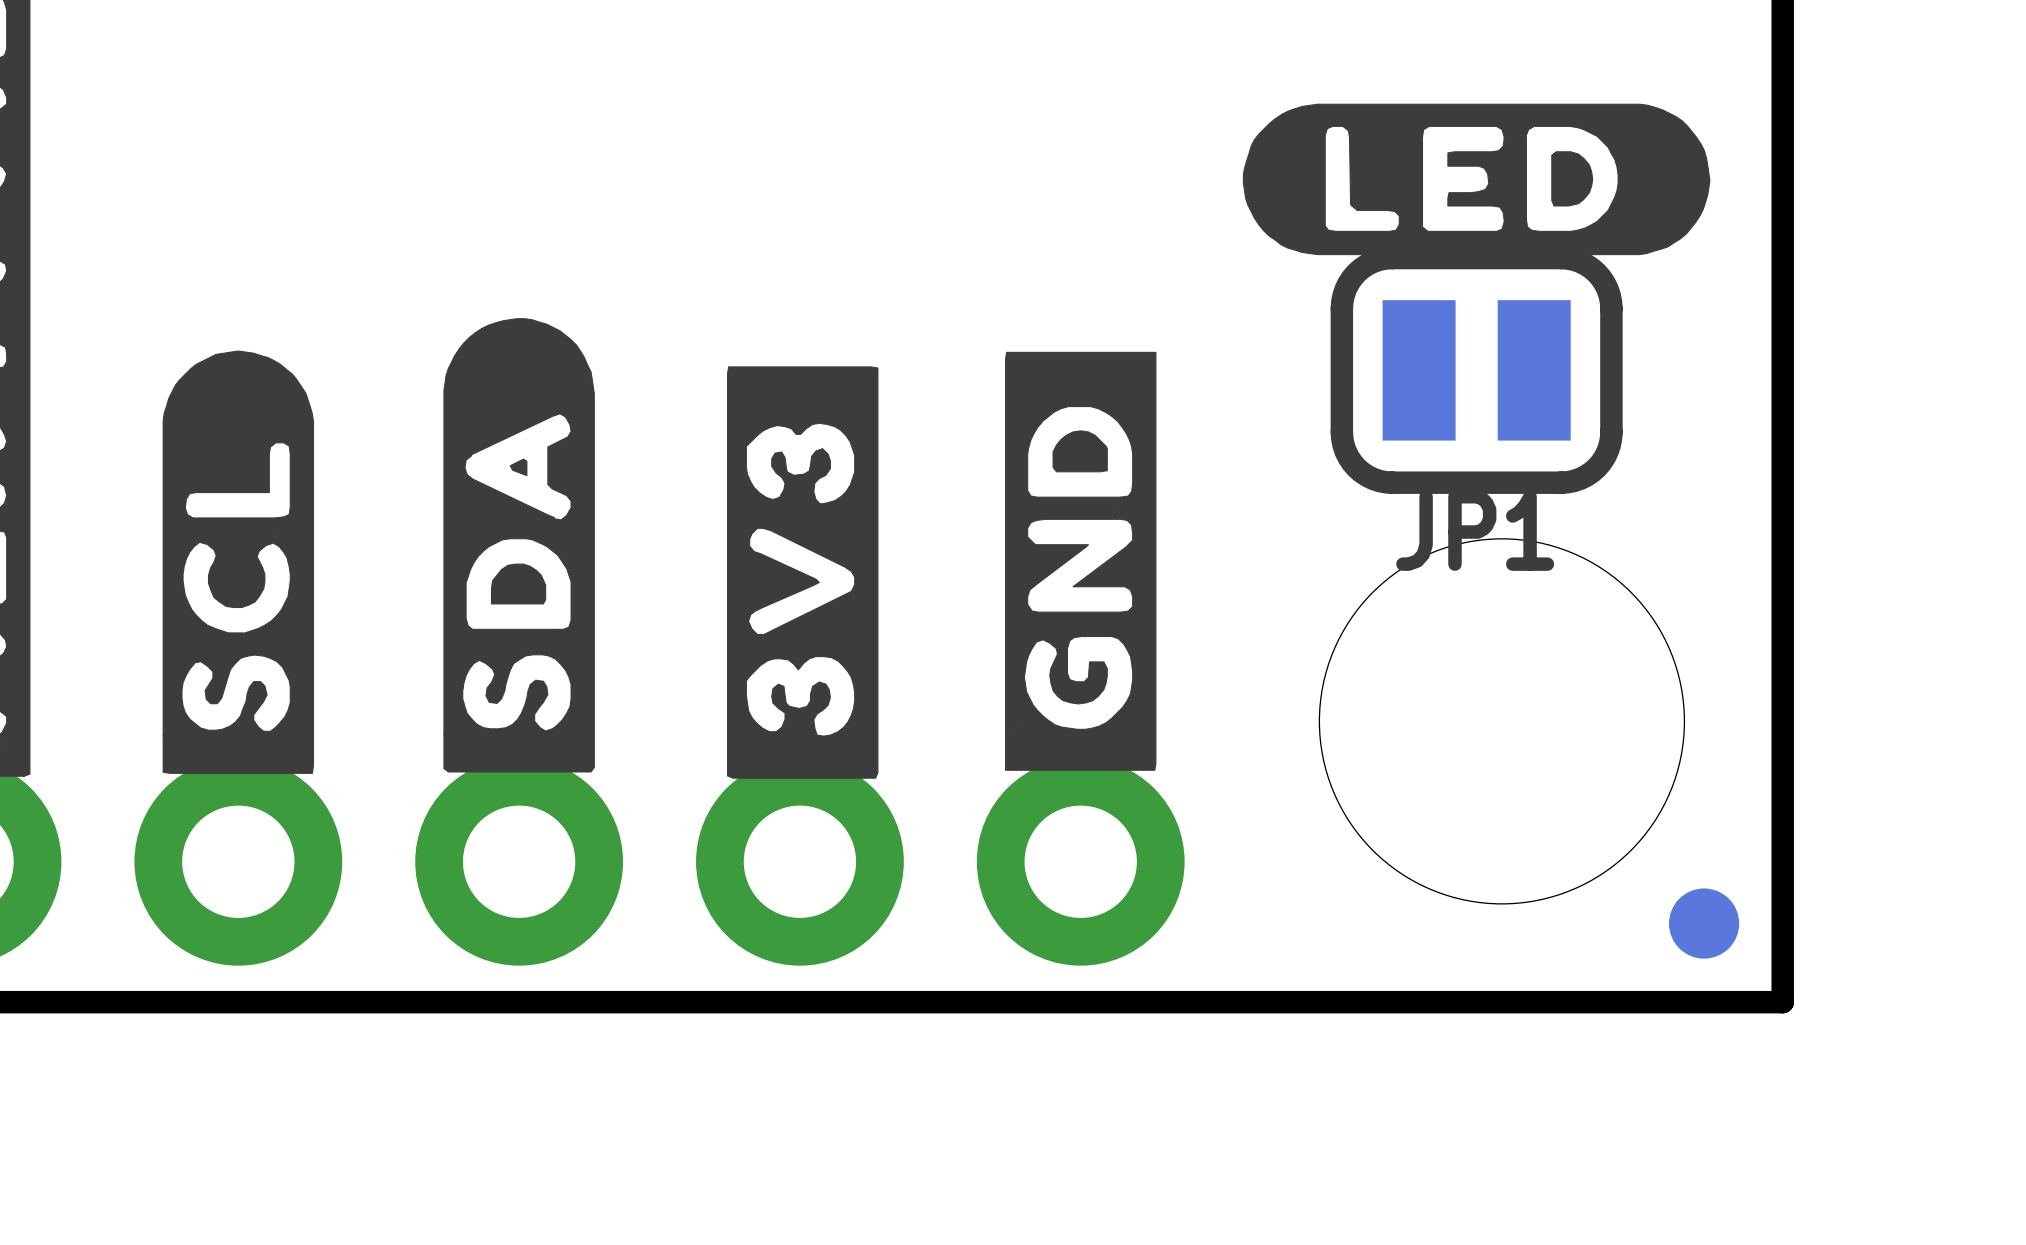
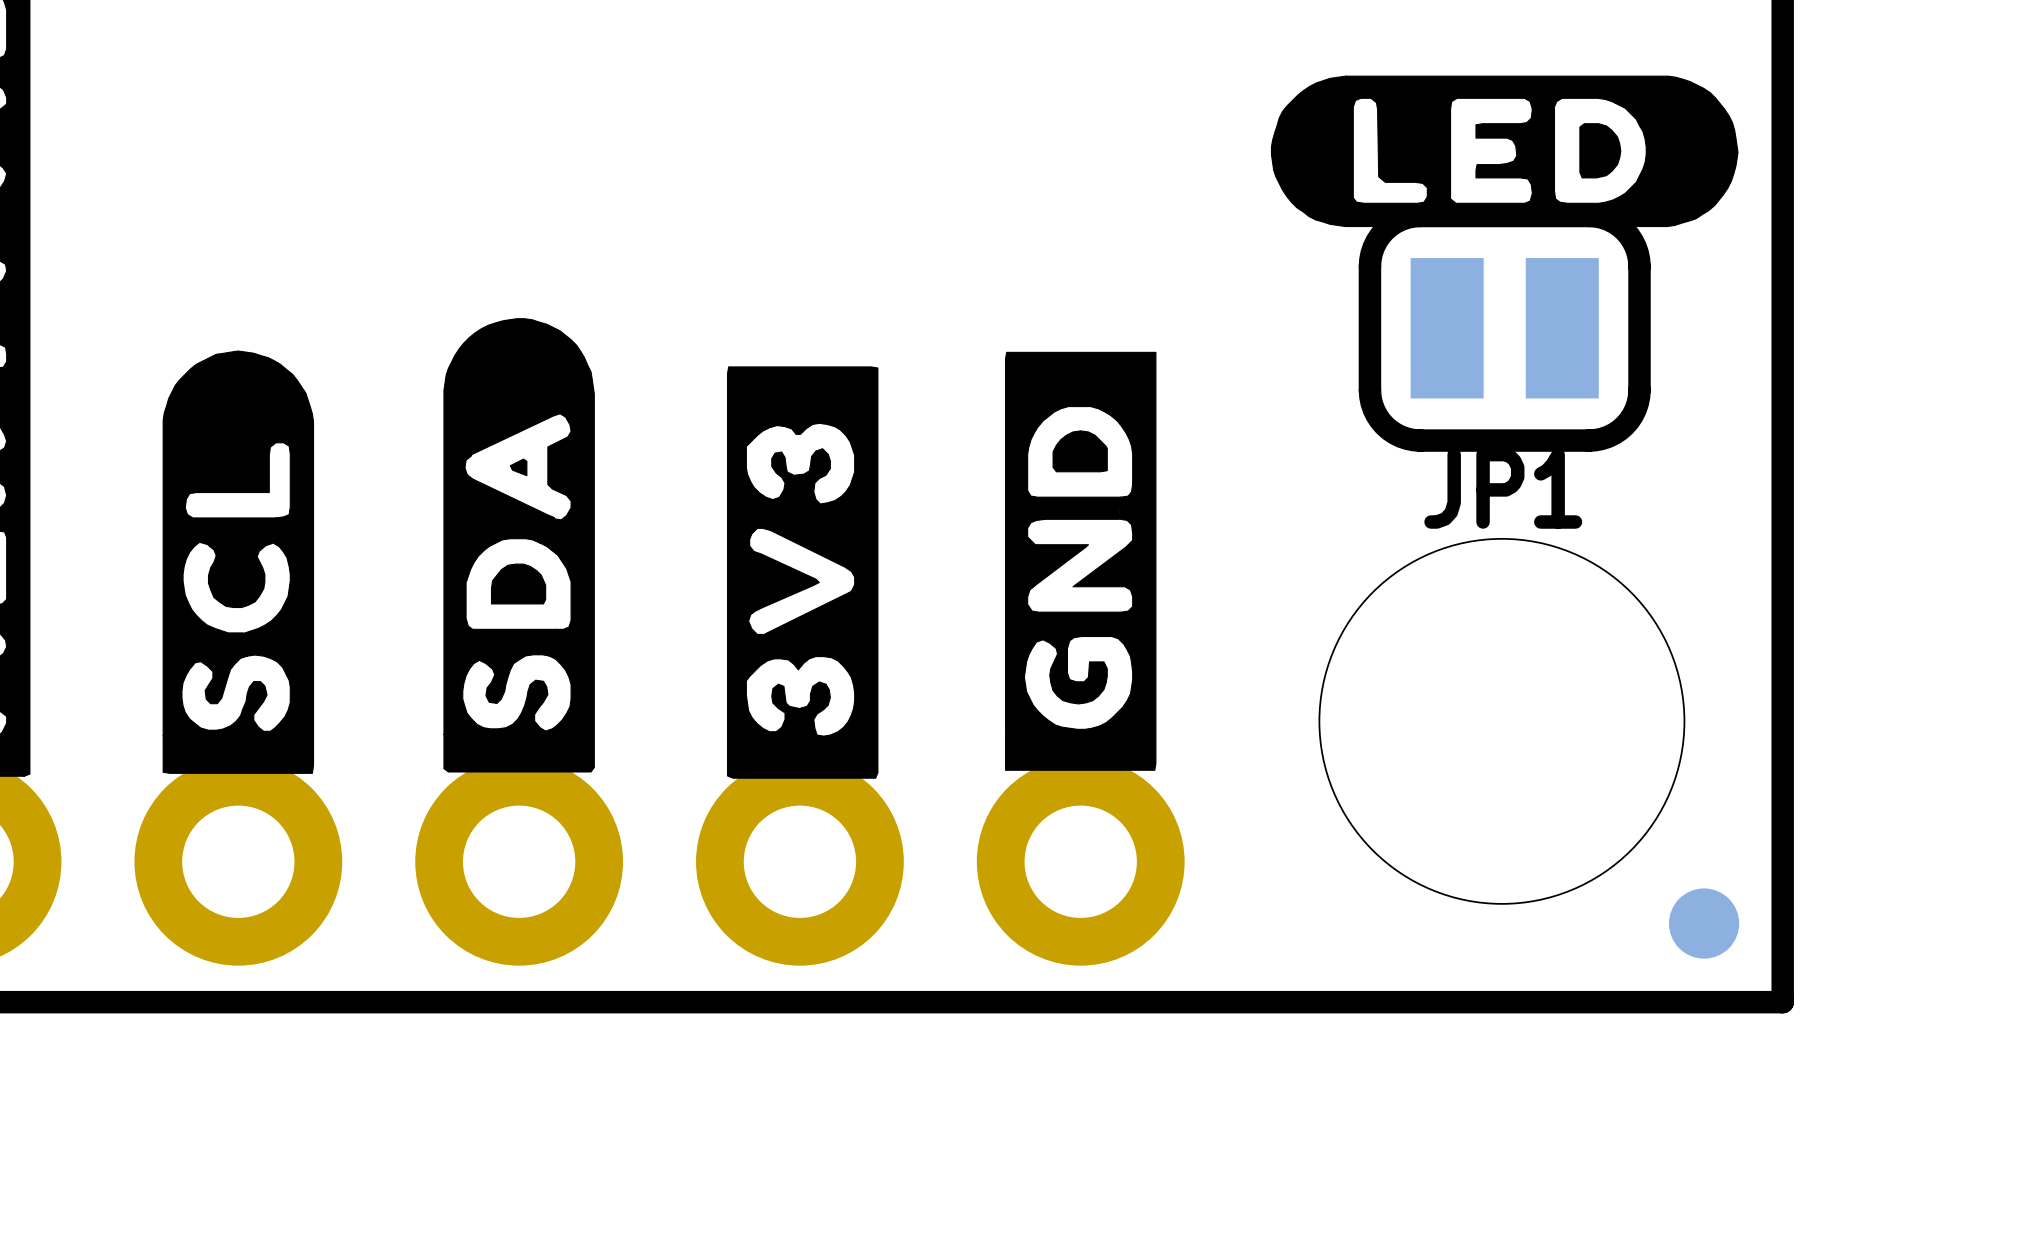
drawing position: (1476, 179) -> (1504, 151)
JP1 position: (1476, 370) -> (1504, 328)

